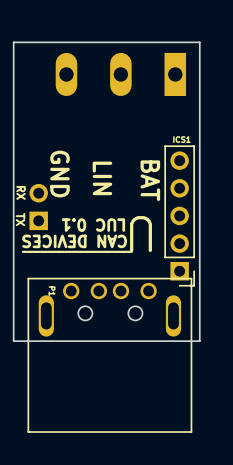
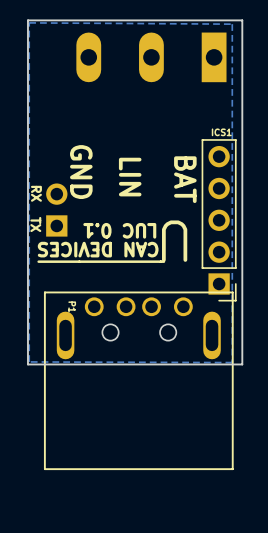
zone outline: none -> (29, 22) (29, 361) (232, 362) (232, 24) (29, 22)

